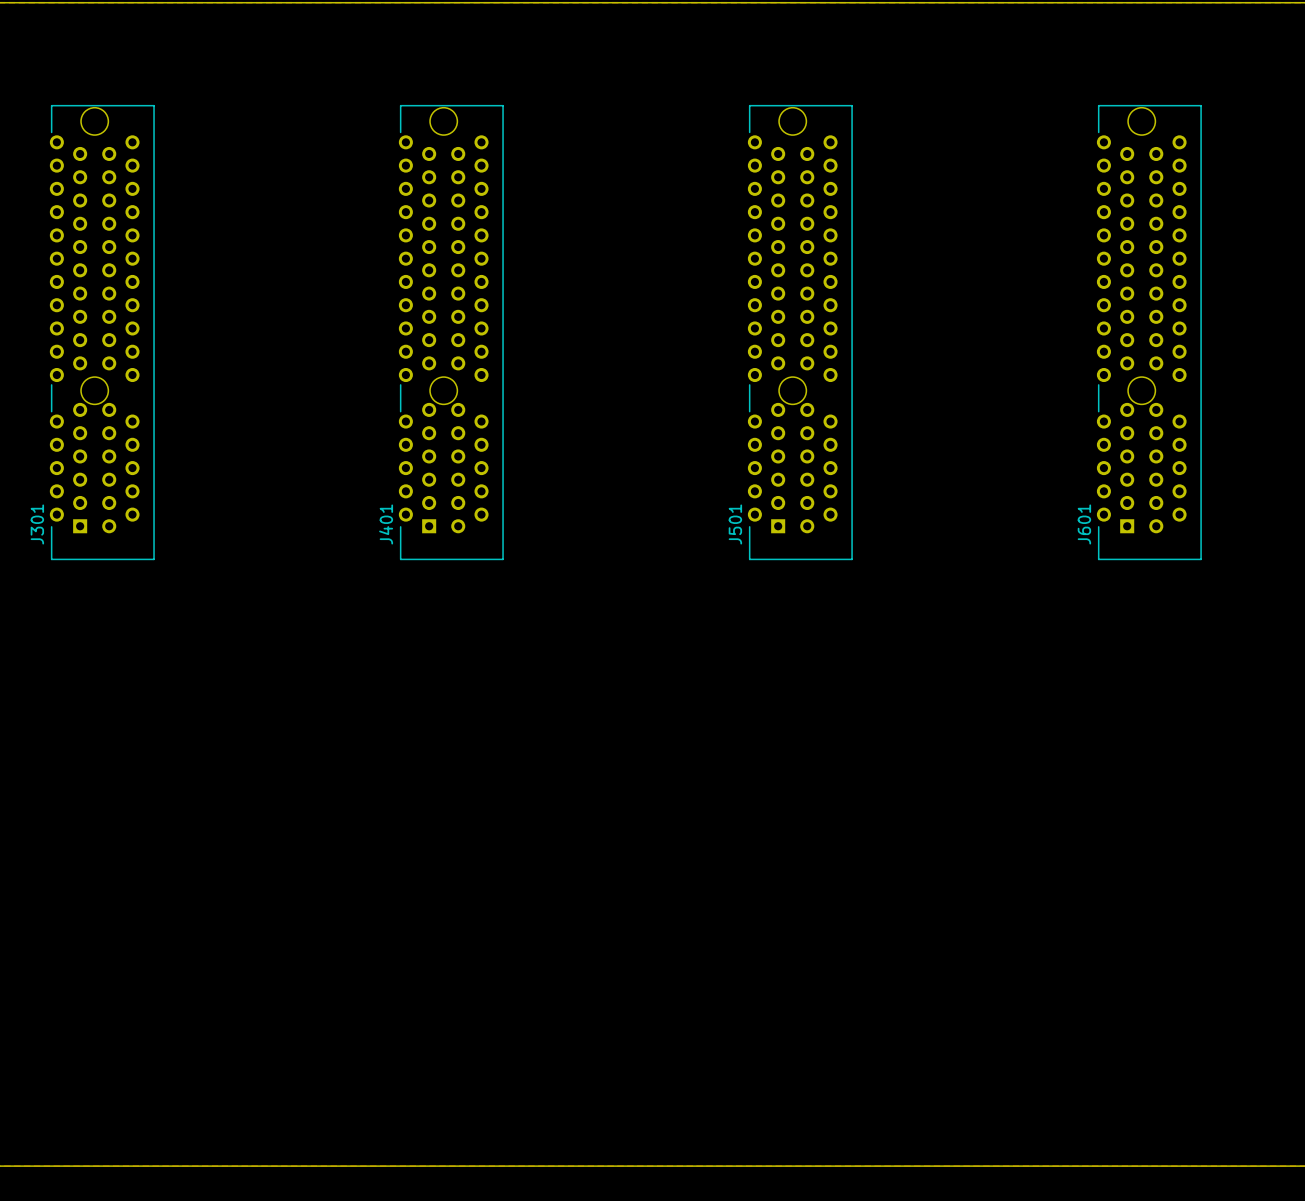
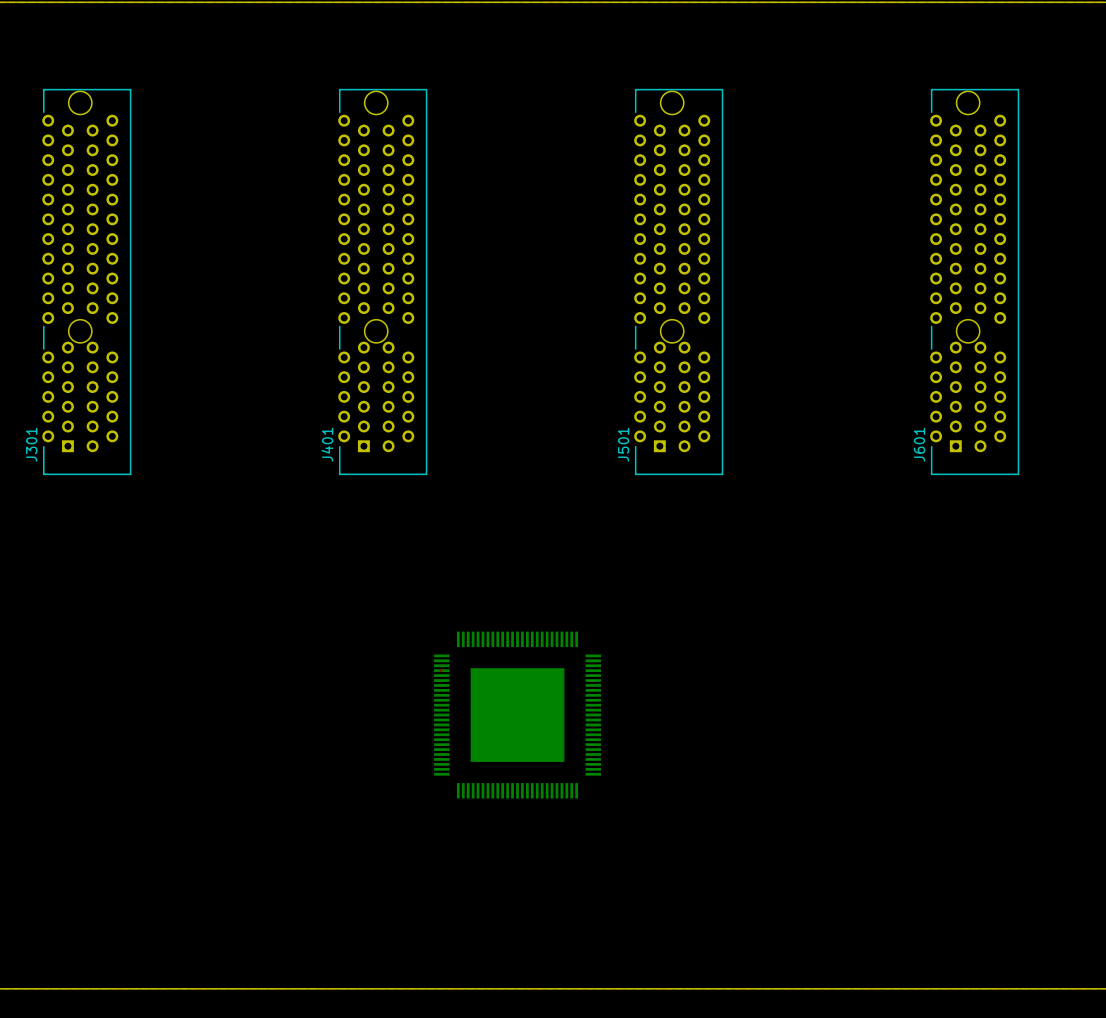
top track: none -> (440, 670) (441, 670)
part: none -> (517, 715)

